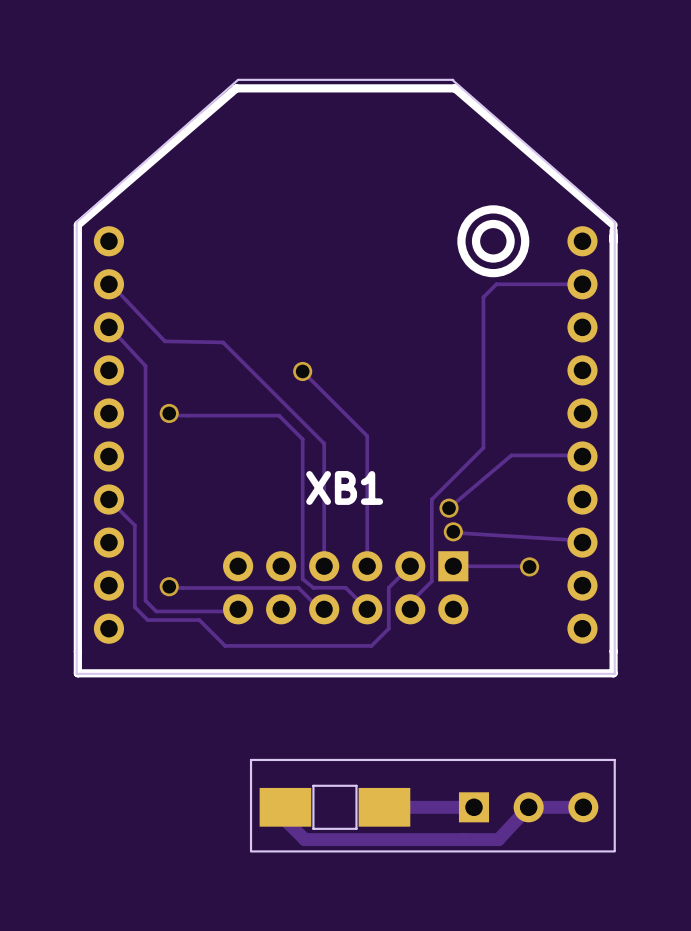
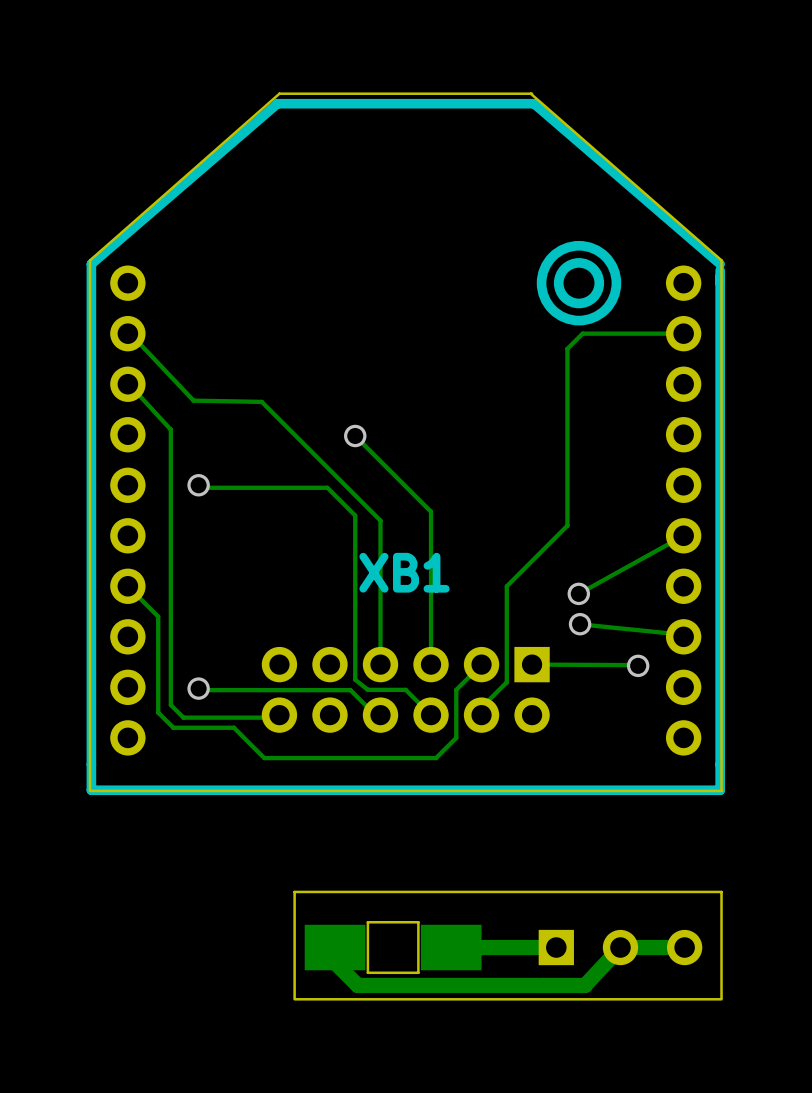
track: (583, 455) (511, 455) (449, 508) -> (684, 534) (578, 593)
via: none -> (578, 593)
via: (449, 508) -> none
track: (453, 531) (578, 540) -> (580, 624) (678, 634)
via: (453, 531) -> none
via: none -> (580, 624)
track: (453, 566) (529, 566) -> (532, 664) (638, 665)
via position: (529, 566) -> (638, 665)

